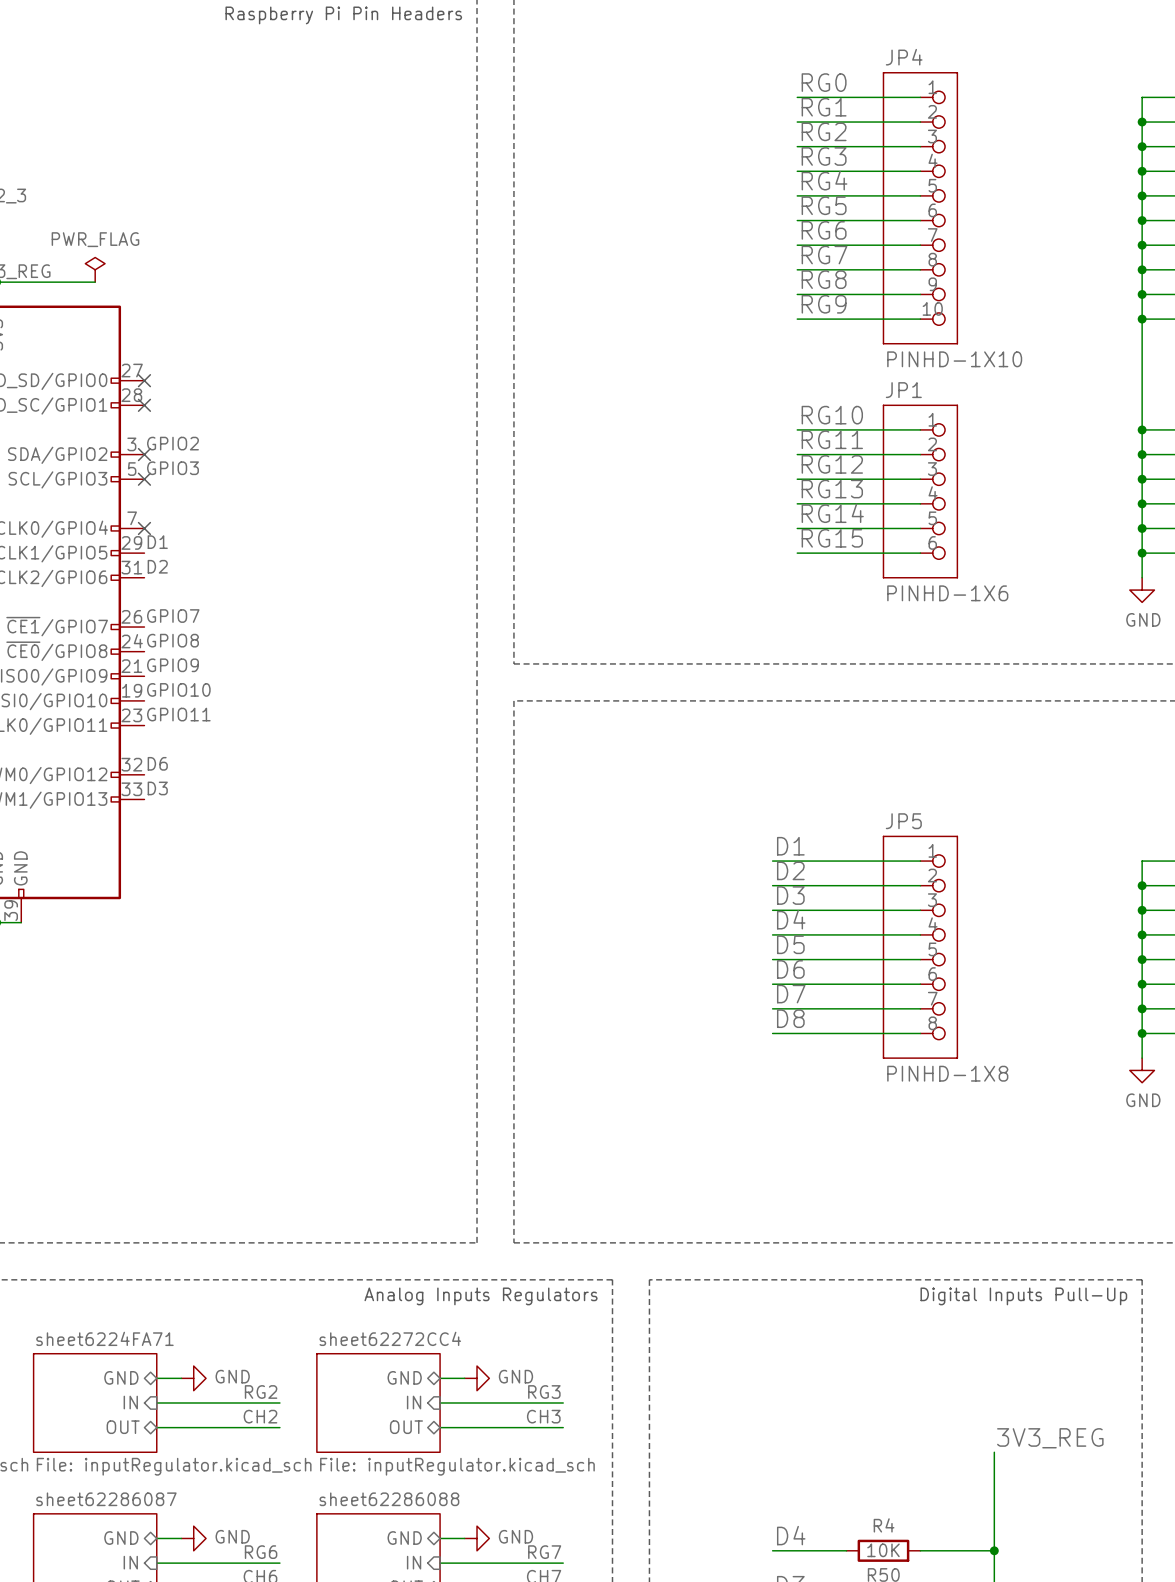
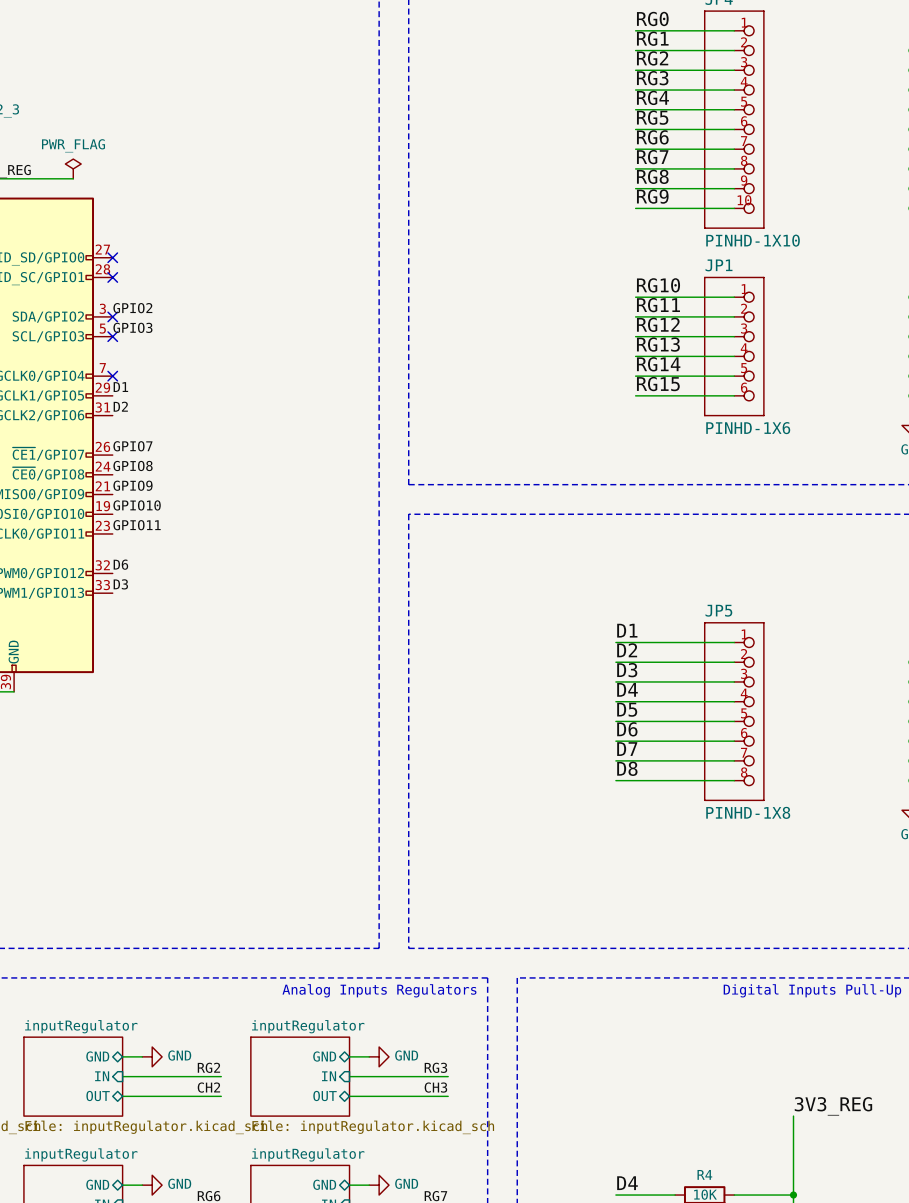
sheet sheet6224FA71 name: sheet6224FA71 (104, 1338) -> inputRegulator (81, 1026)
sheet sheet62272CC4 name: sheet62272CC4 (390, 1338) -> inputRegulator (308, 1026)
sheet sheet62286087 name: sheet62286087 (106, 1499) -> inputRegulator (81, 1154)
sheet sheet62286088 name: sheet62286088 (389, 1499) -> inputRegulator (308, 1154)

